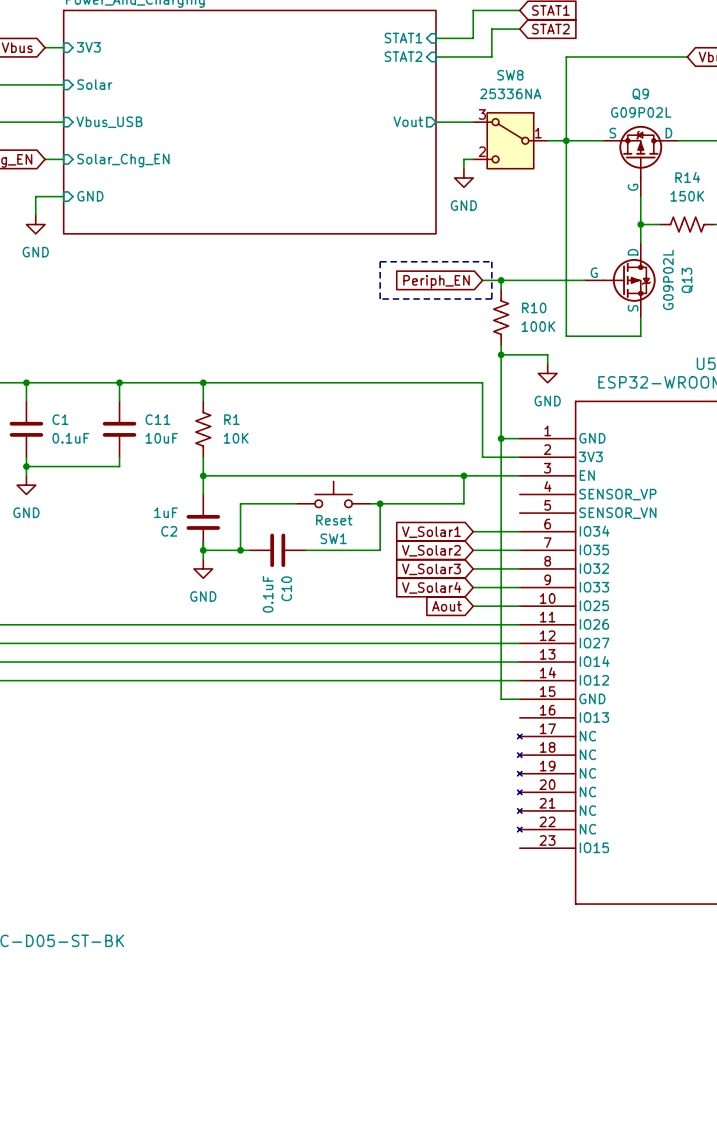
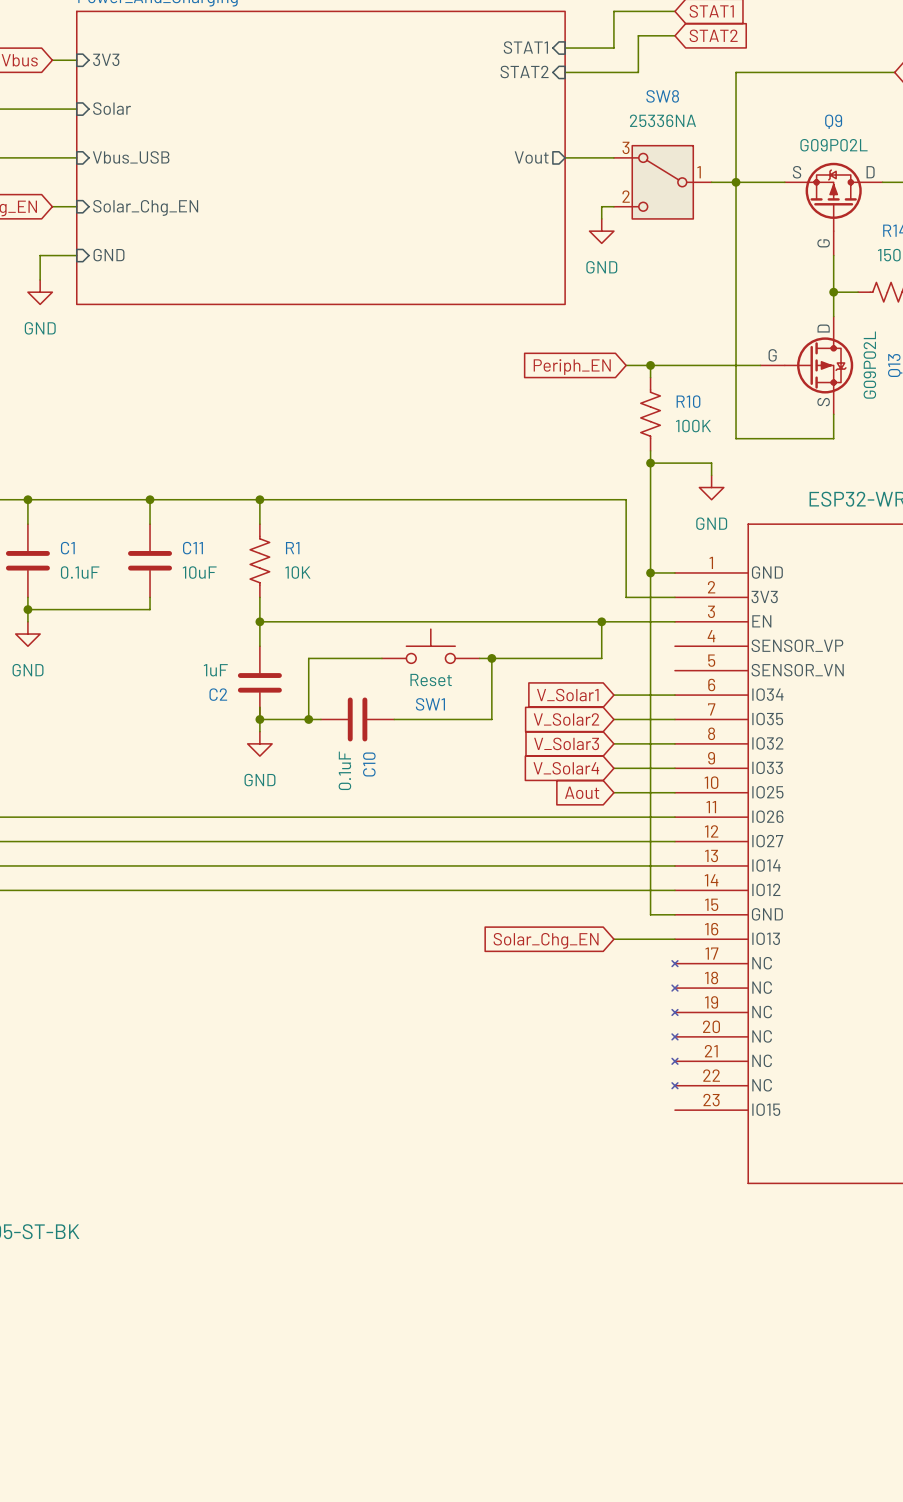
line: (380, 261) (491, 261) (491, 299) (380, 299) (380, 261) -> none
wire: none -> (613, 939) (674, 939)
global label: none -> Solar_Chg_EN (546, 940)

